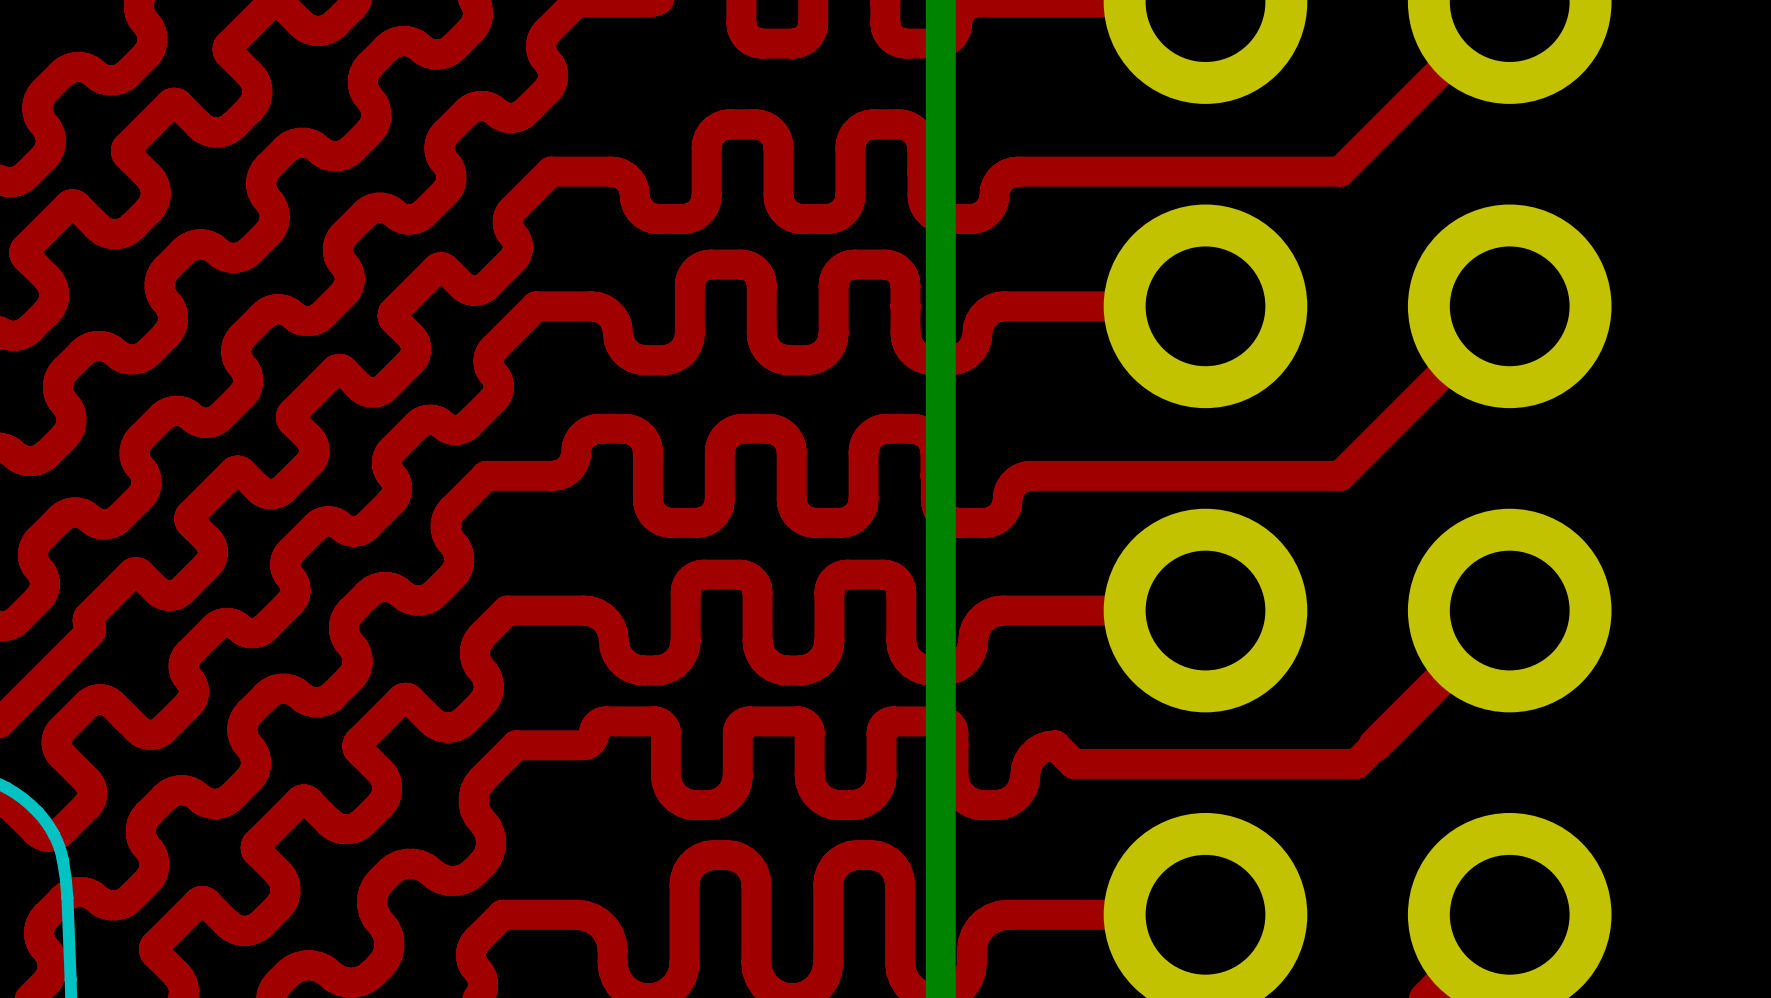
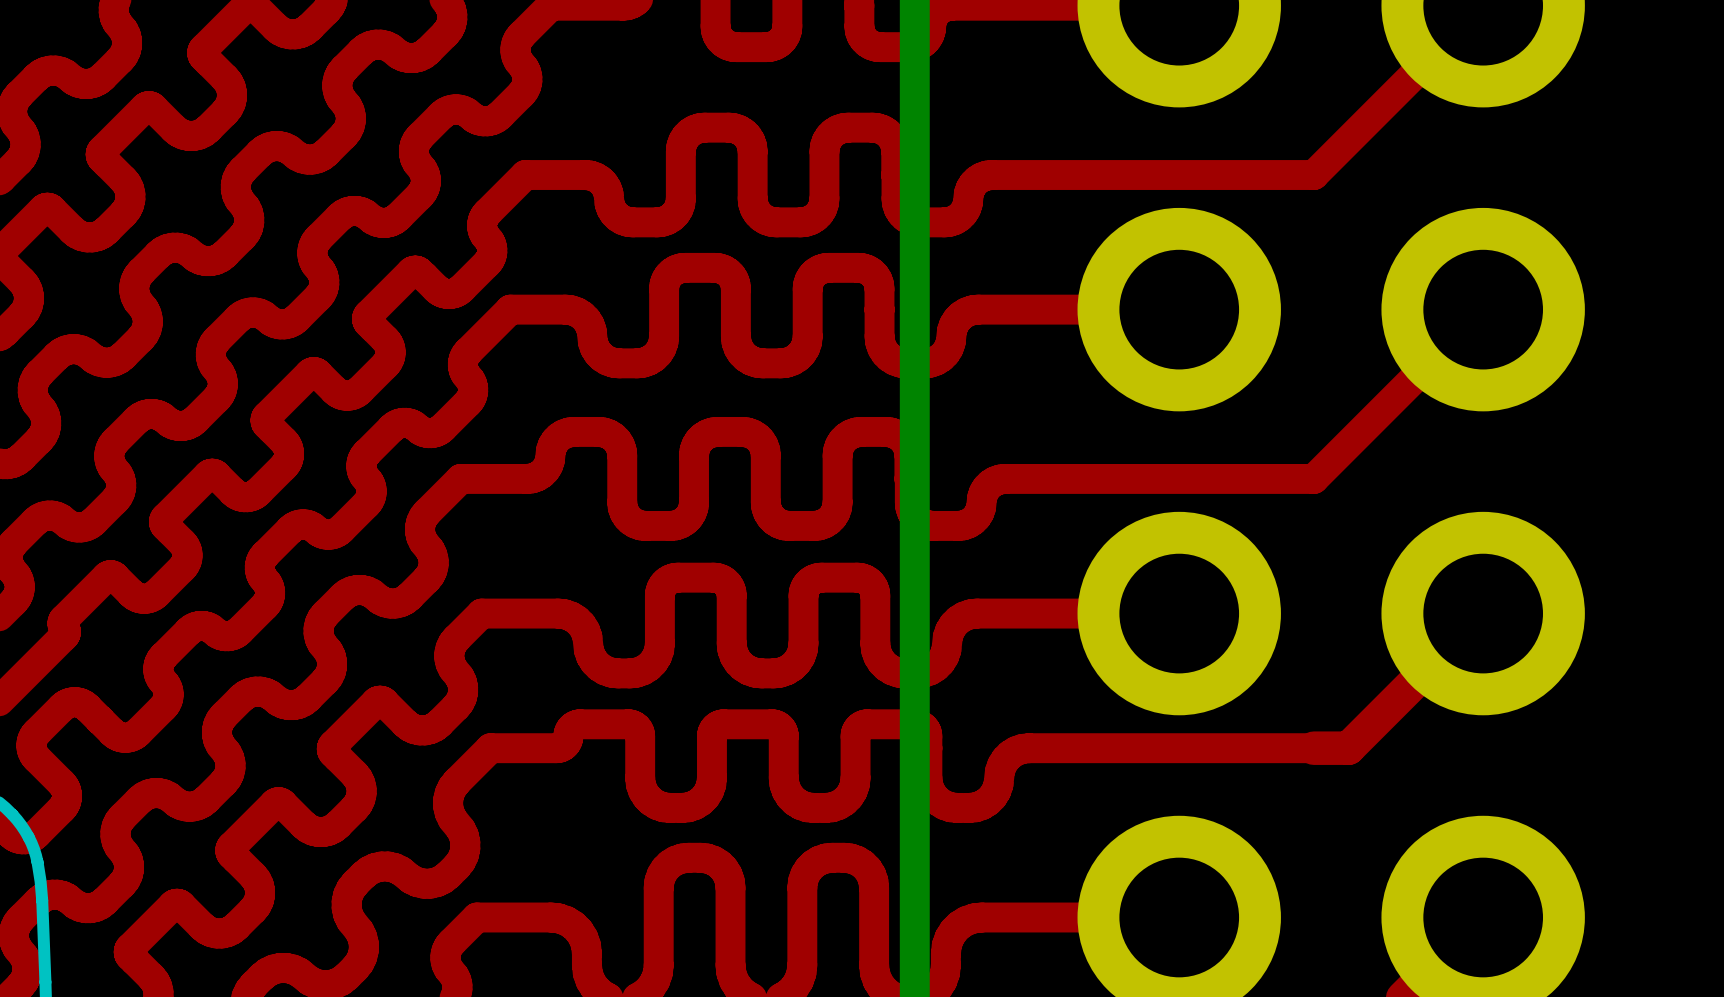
top track: (1374, 745) (1356, 763) (1073, 763) (1055, 745) -> (1348, 748) (1029, 748)

